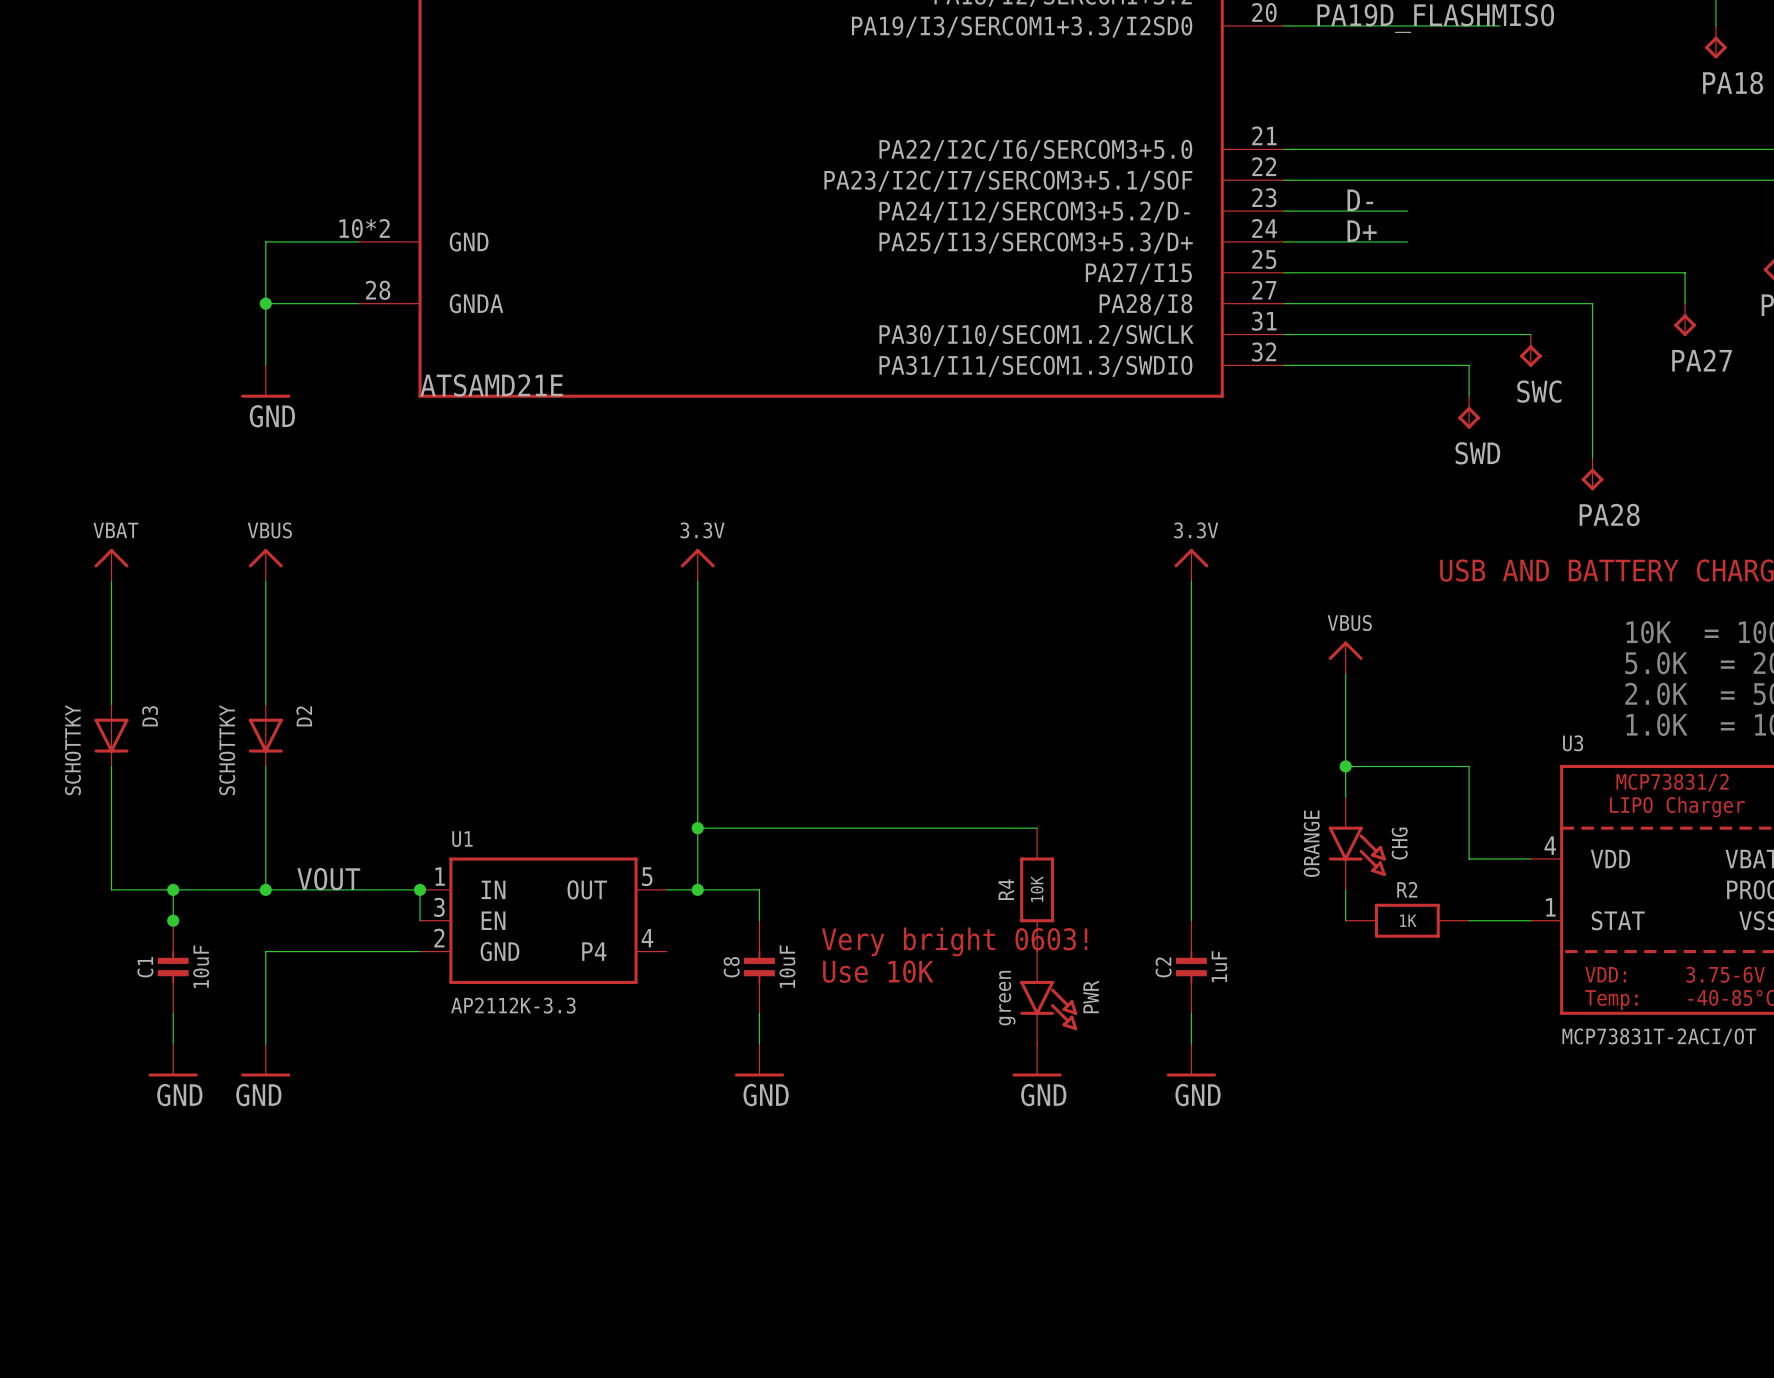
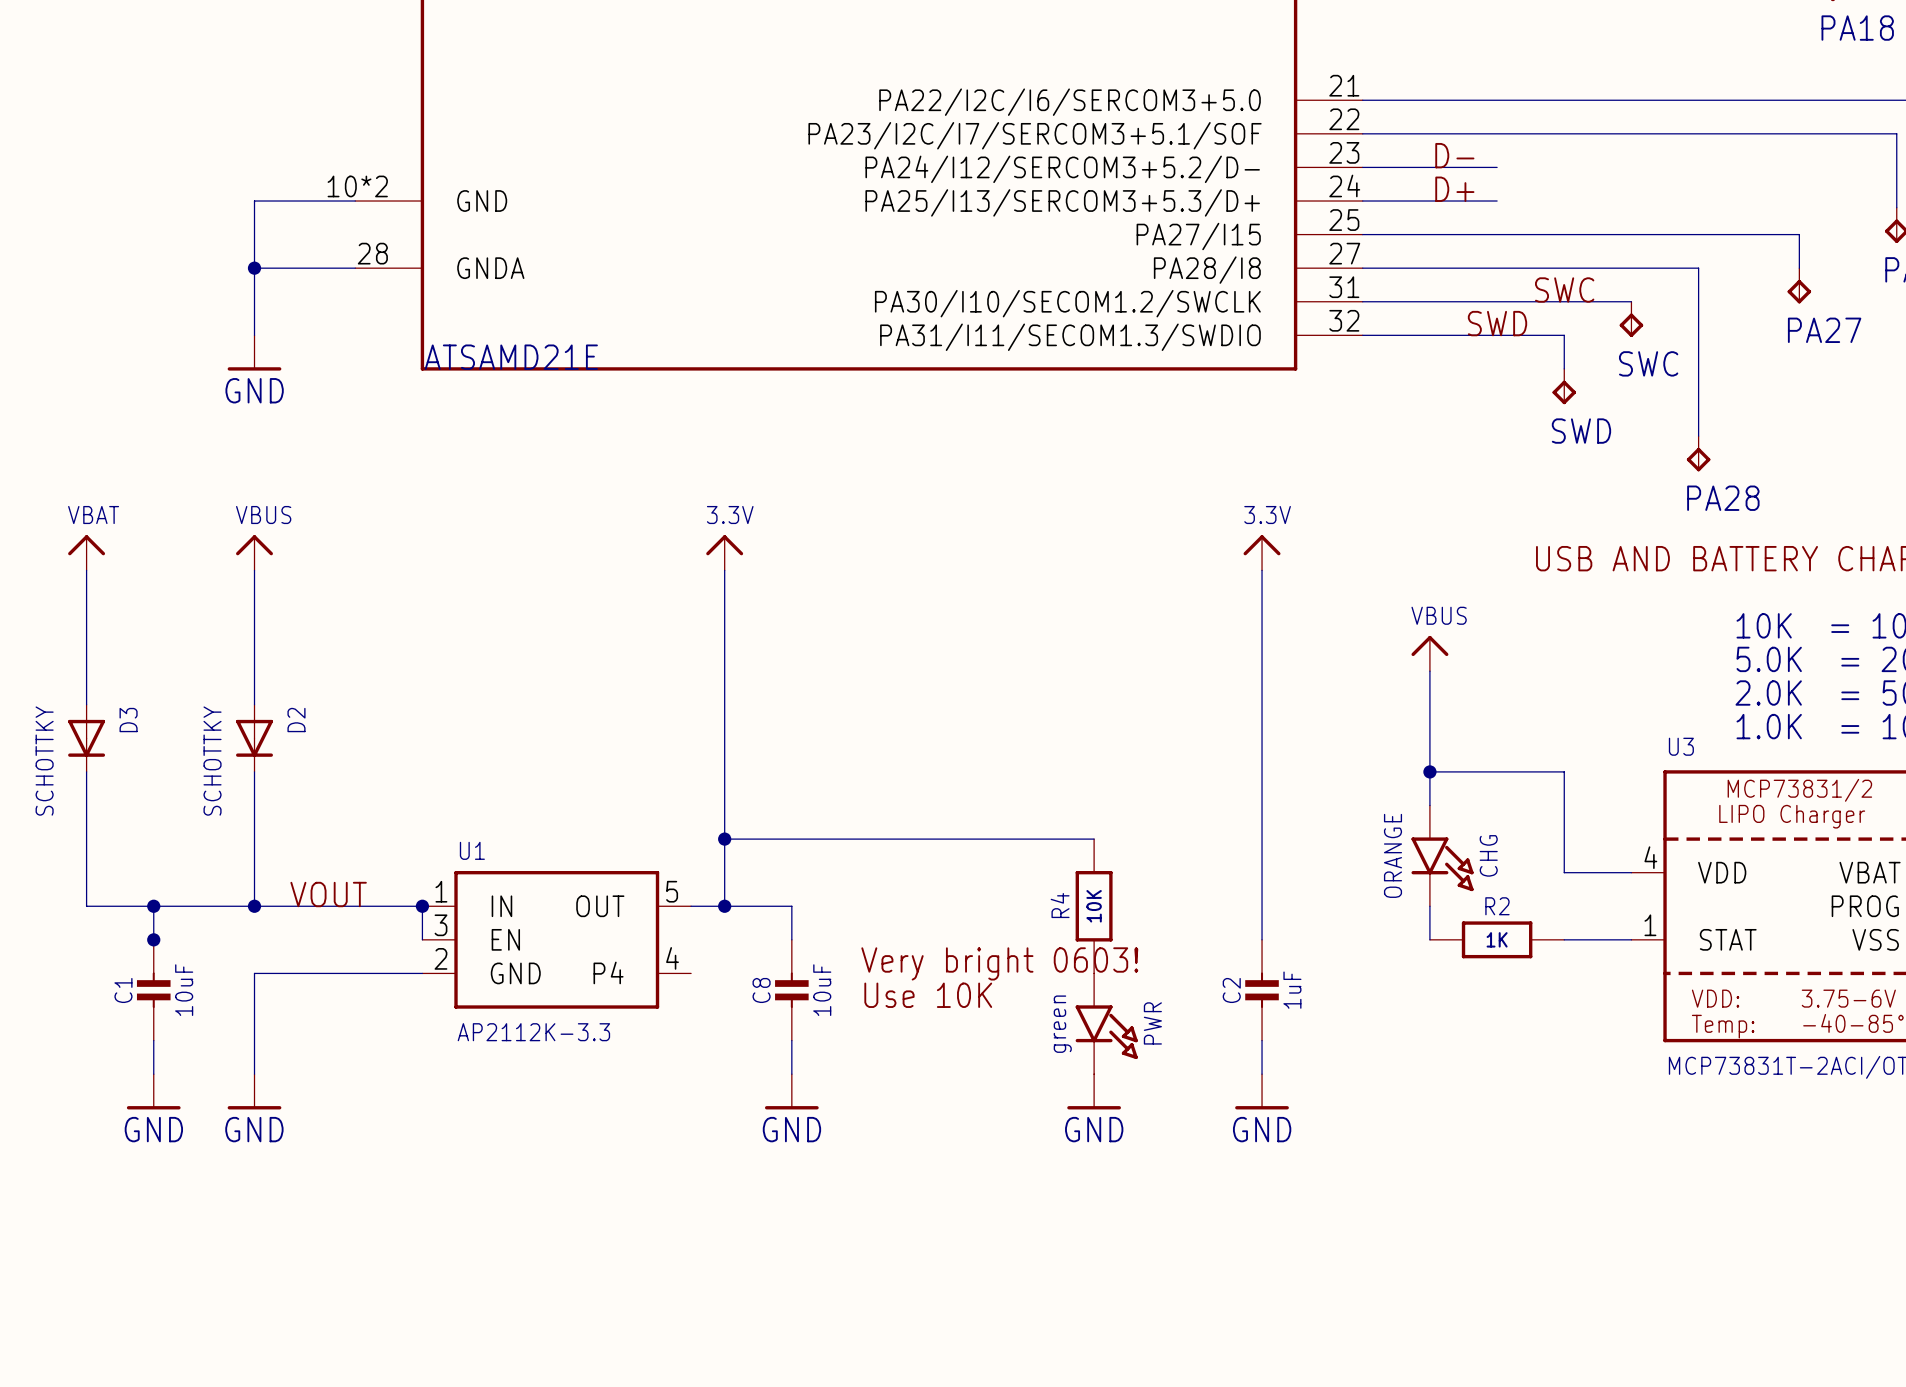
label: none -> SWC (1564, 290)
label: none -> SWD (1497, 323)

